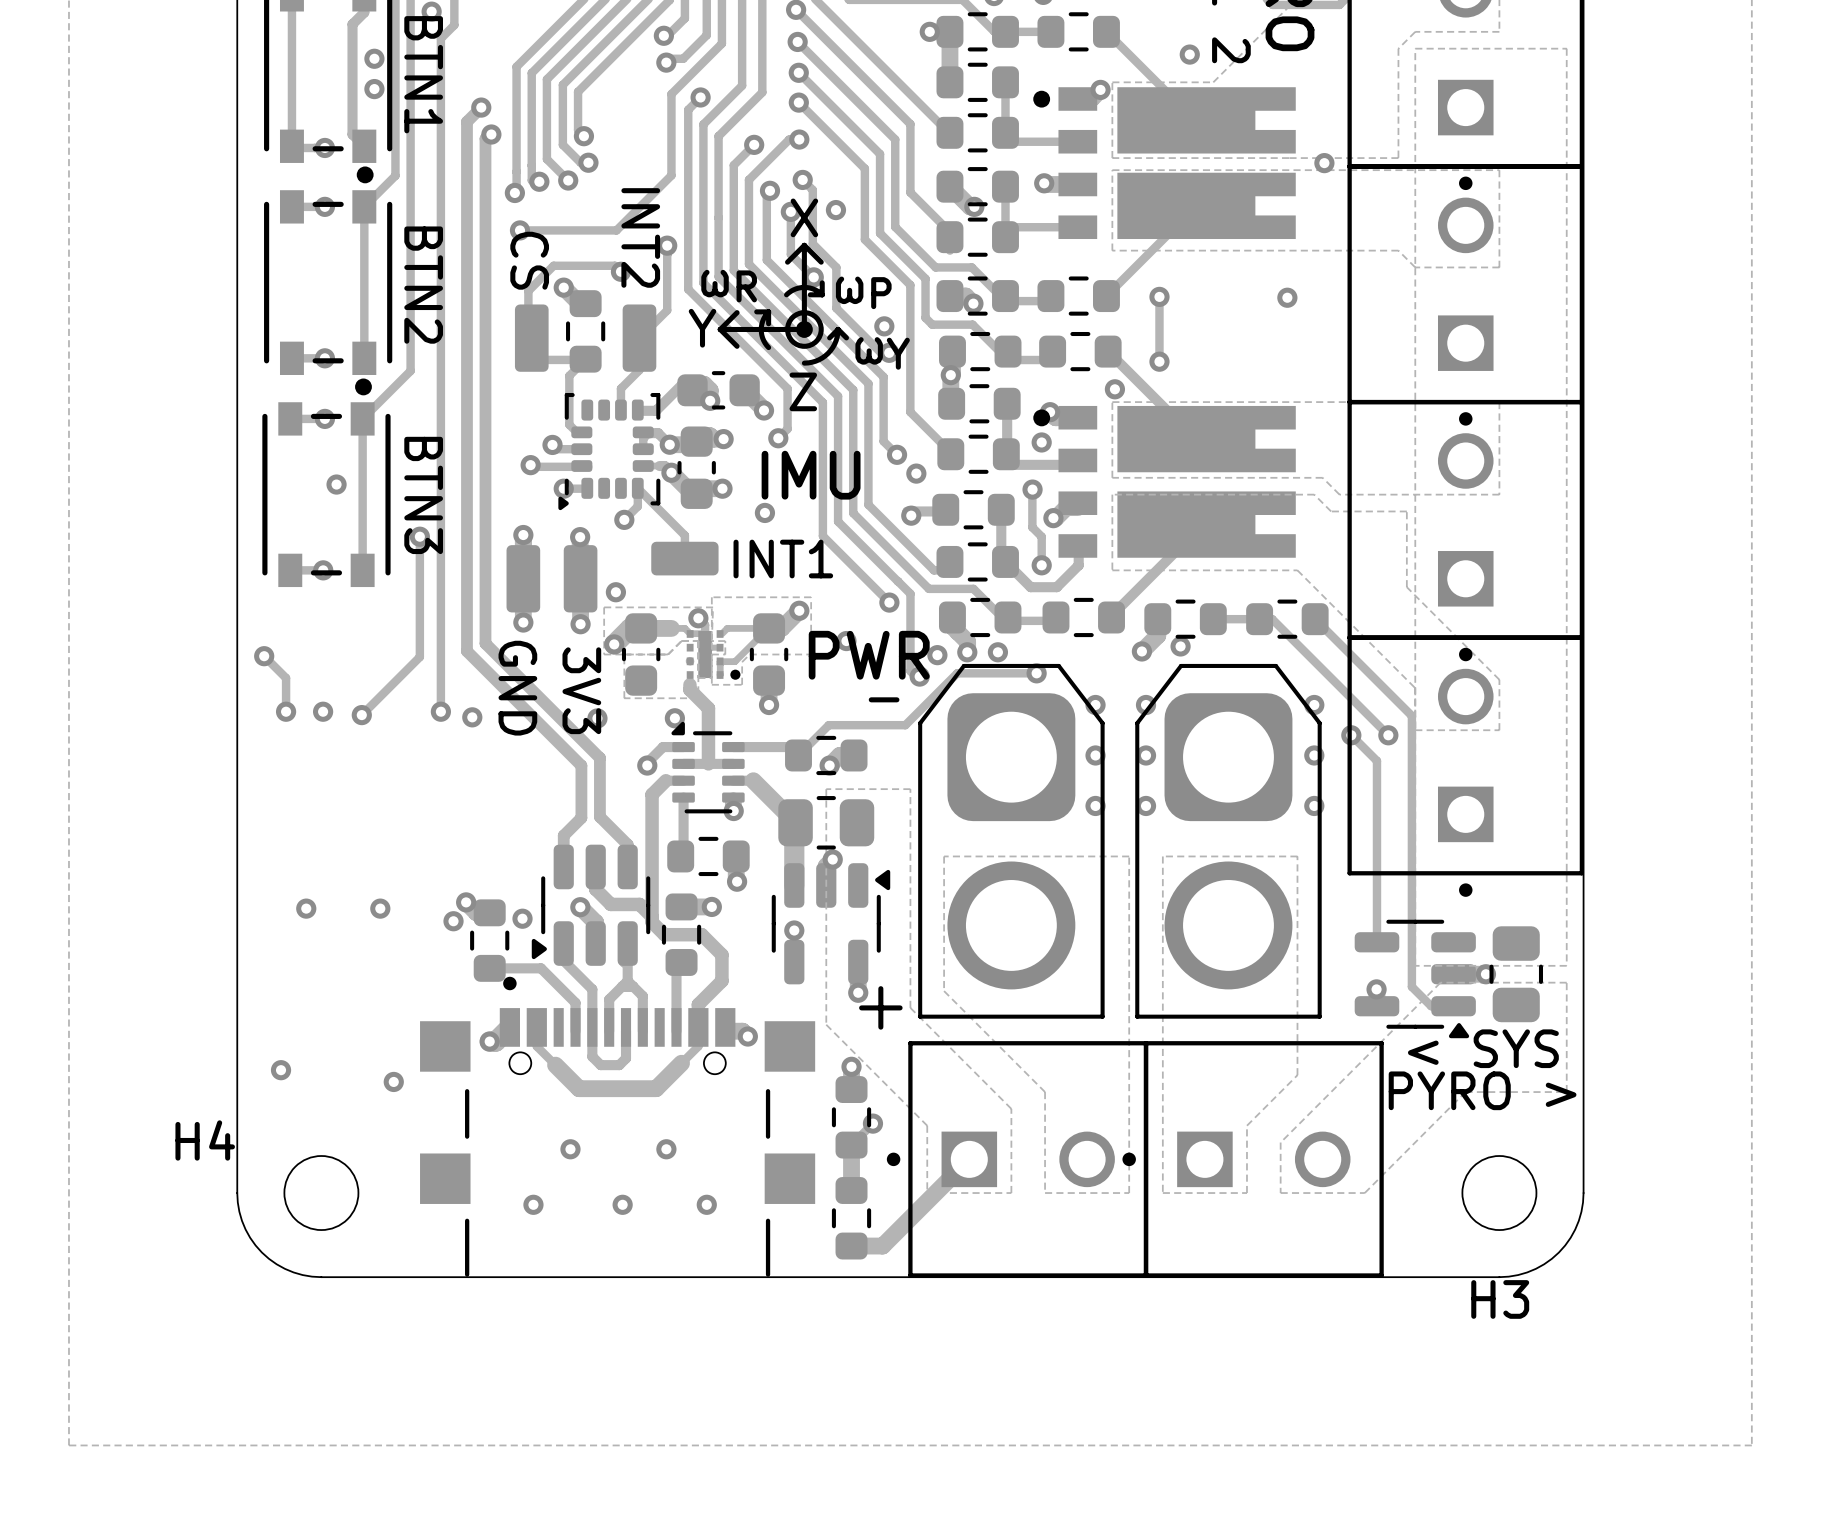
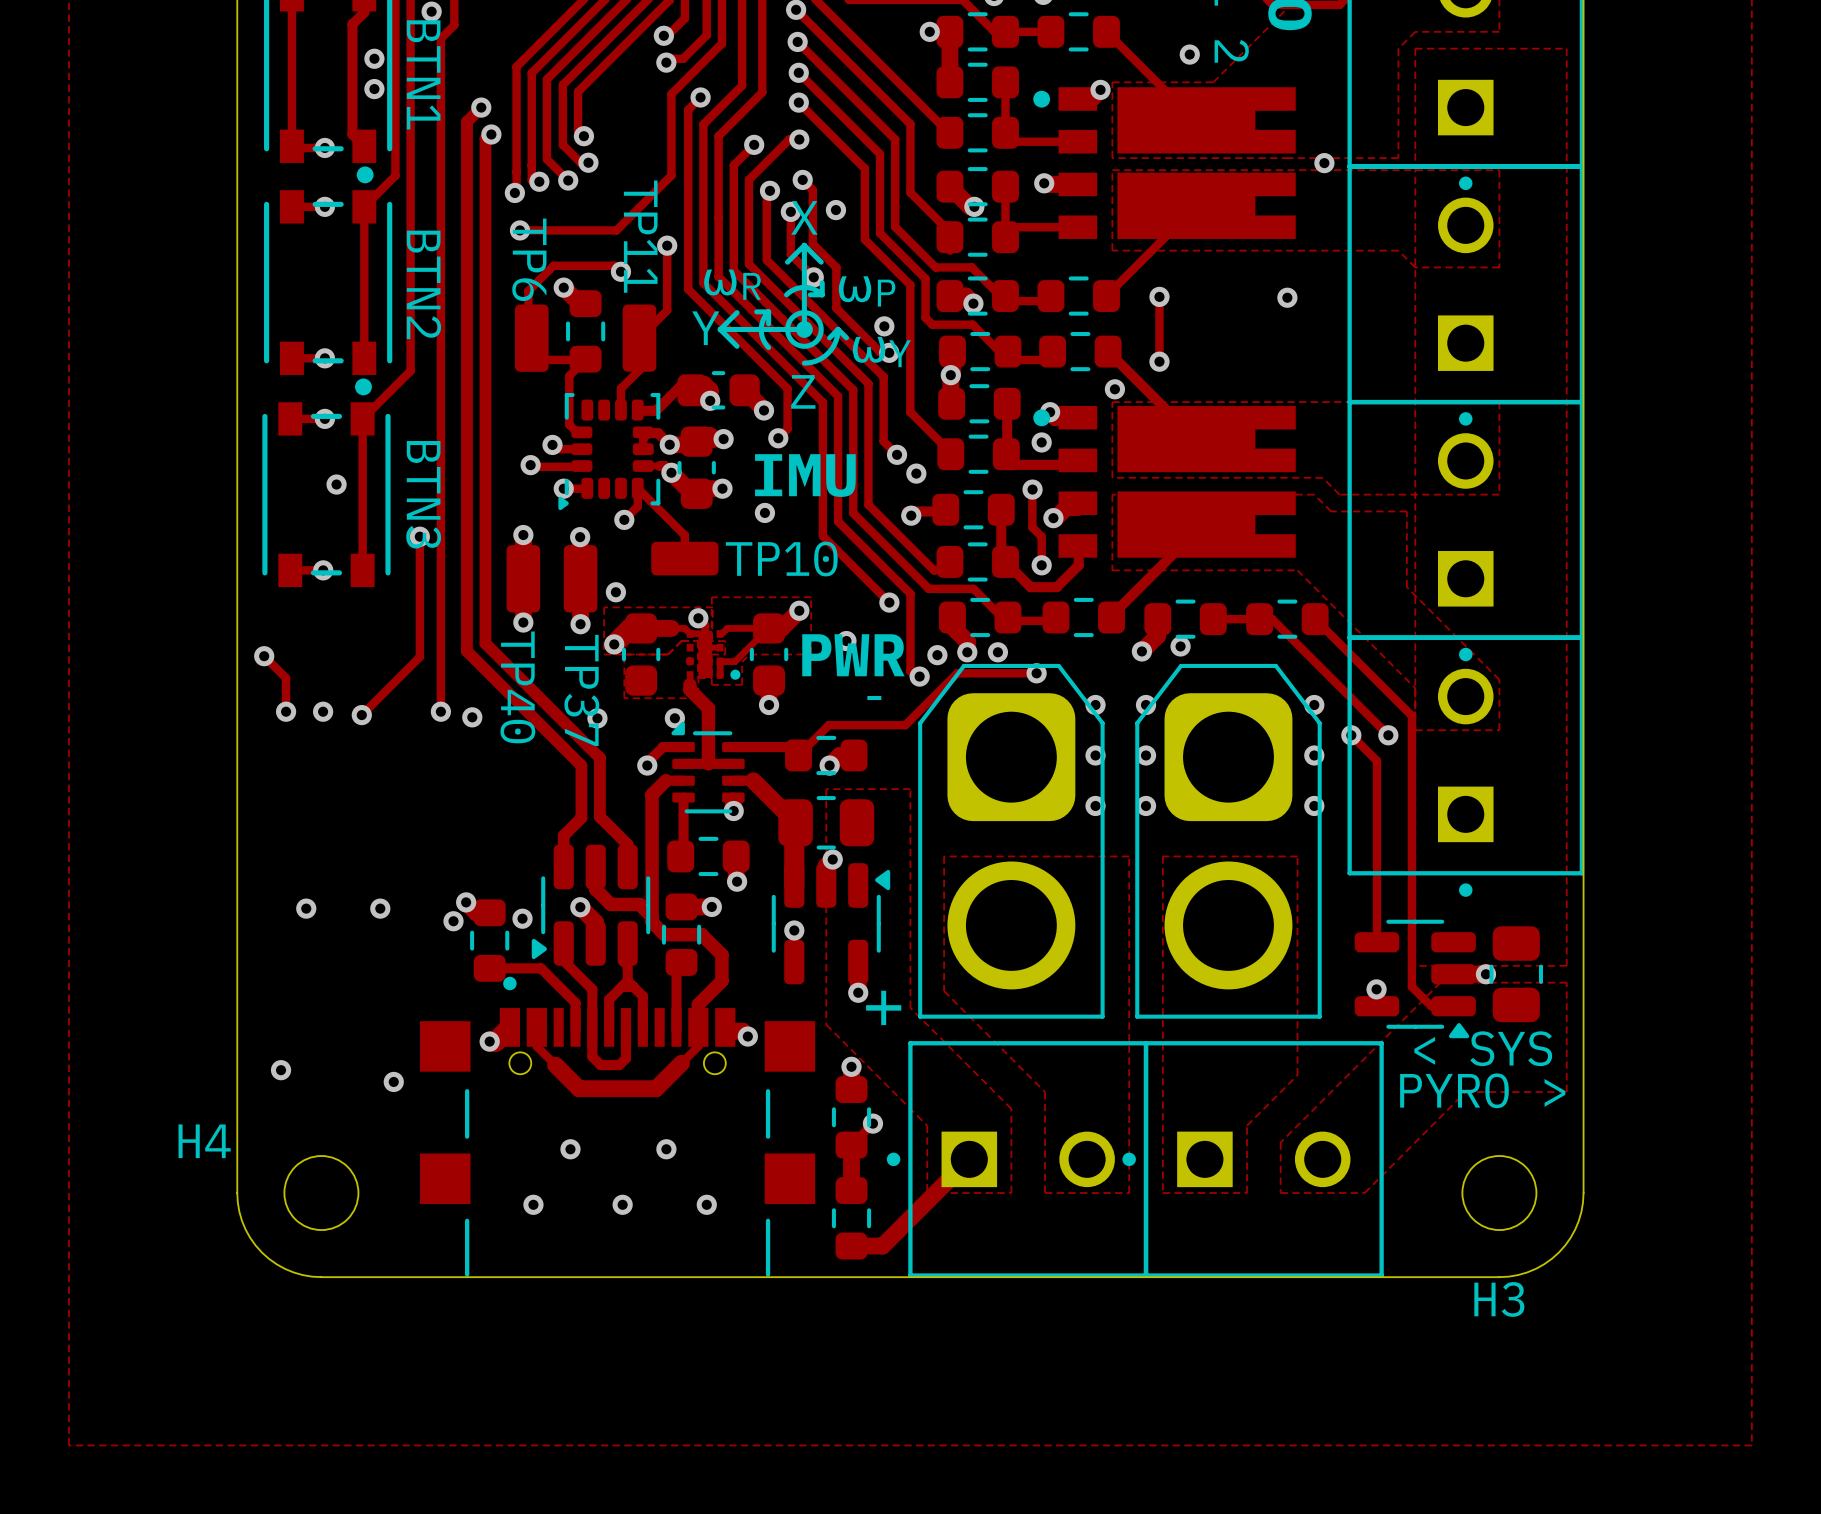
INT2 name: INT2 (640, 237) -> TP11 (640, 236)
CS name: CS (529, 260) -> TP6 (529, 259)
INT1 name: INT1 (783, 559) -> TP10 (781, 559)
GND name: GND (517, 688) -> TP40 (517, 687)
3V3 name: 3V3 (581, 690) -> TP37 (581, 690)

